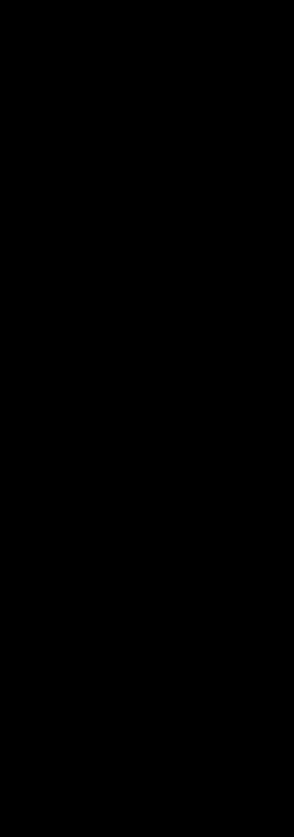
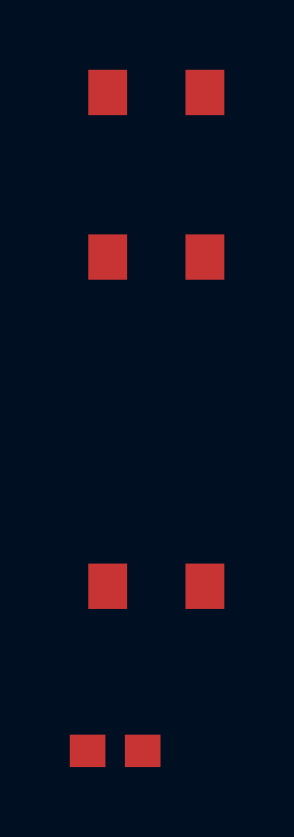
part: none -> (156, 92)
part: none -> (156, 257)
part: none -> (156, 586)
part: none -> (115, 750)

